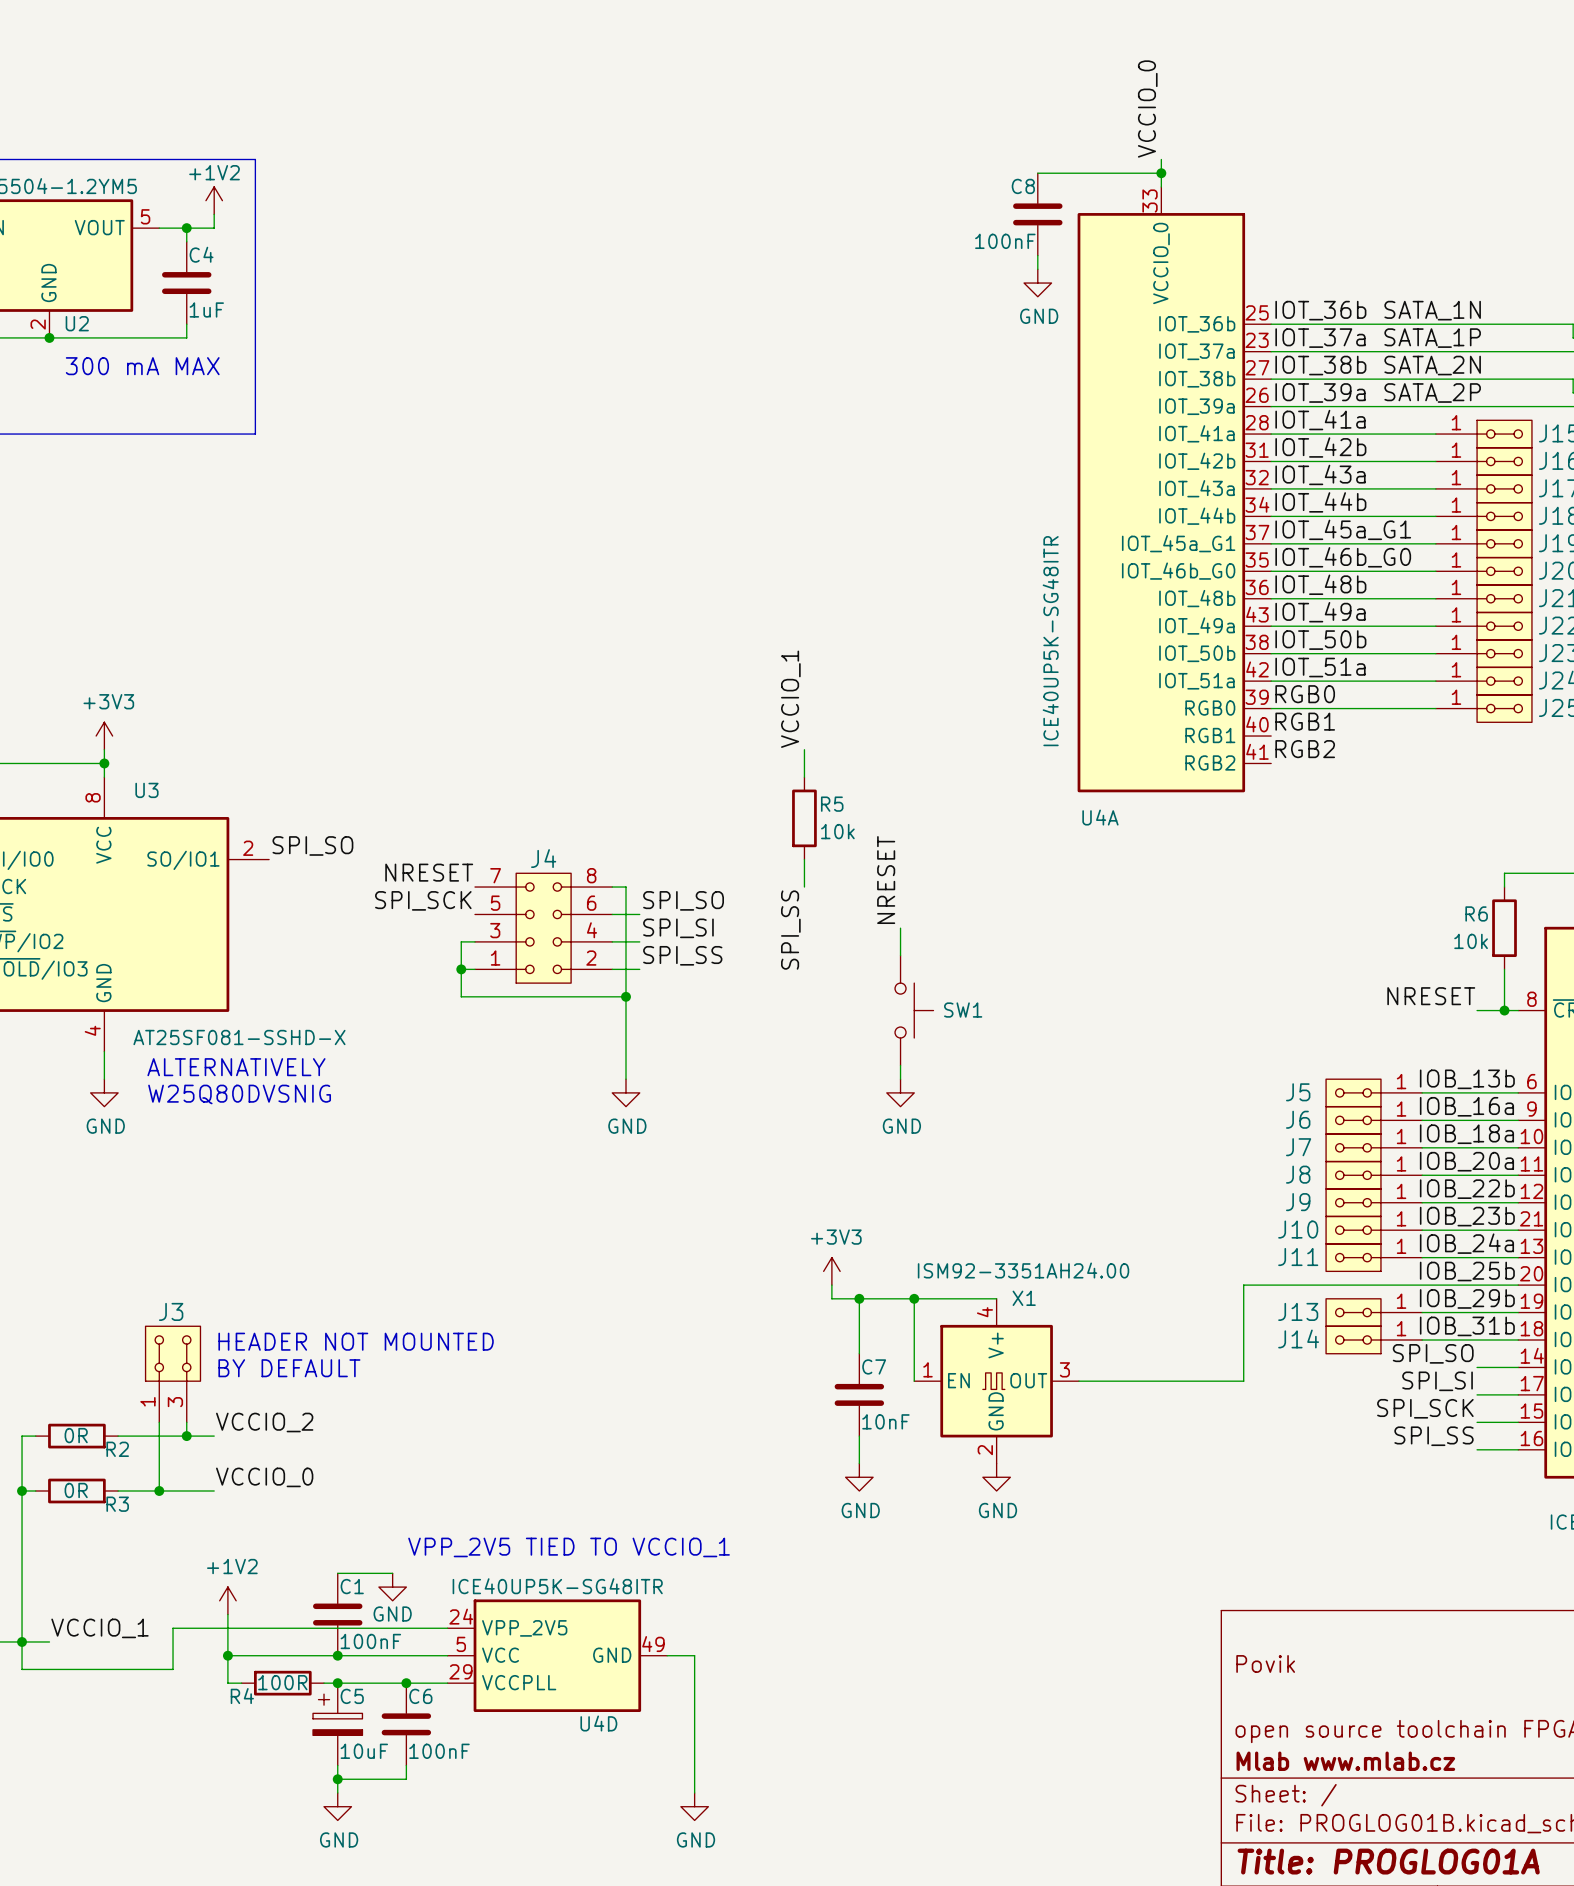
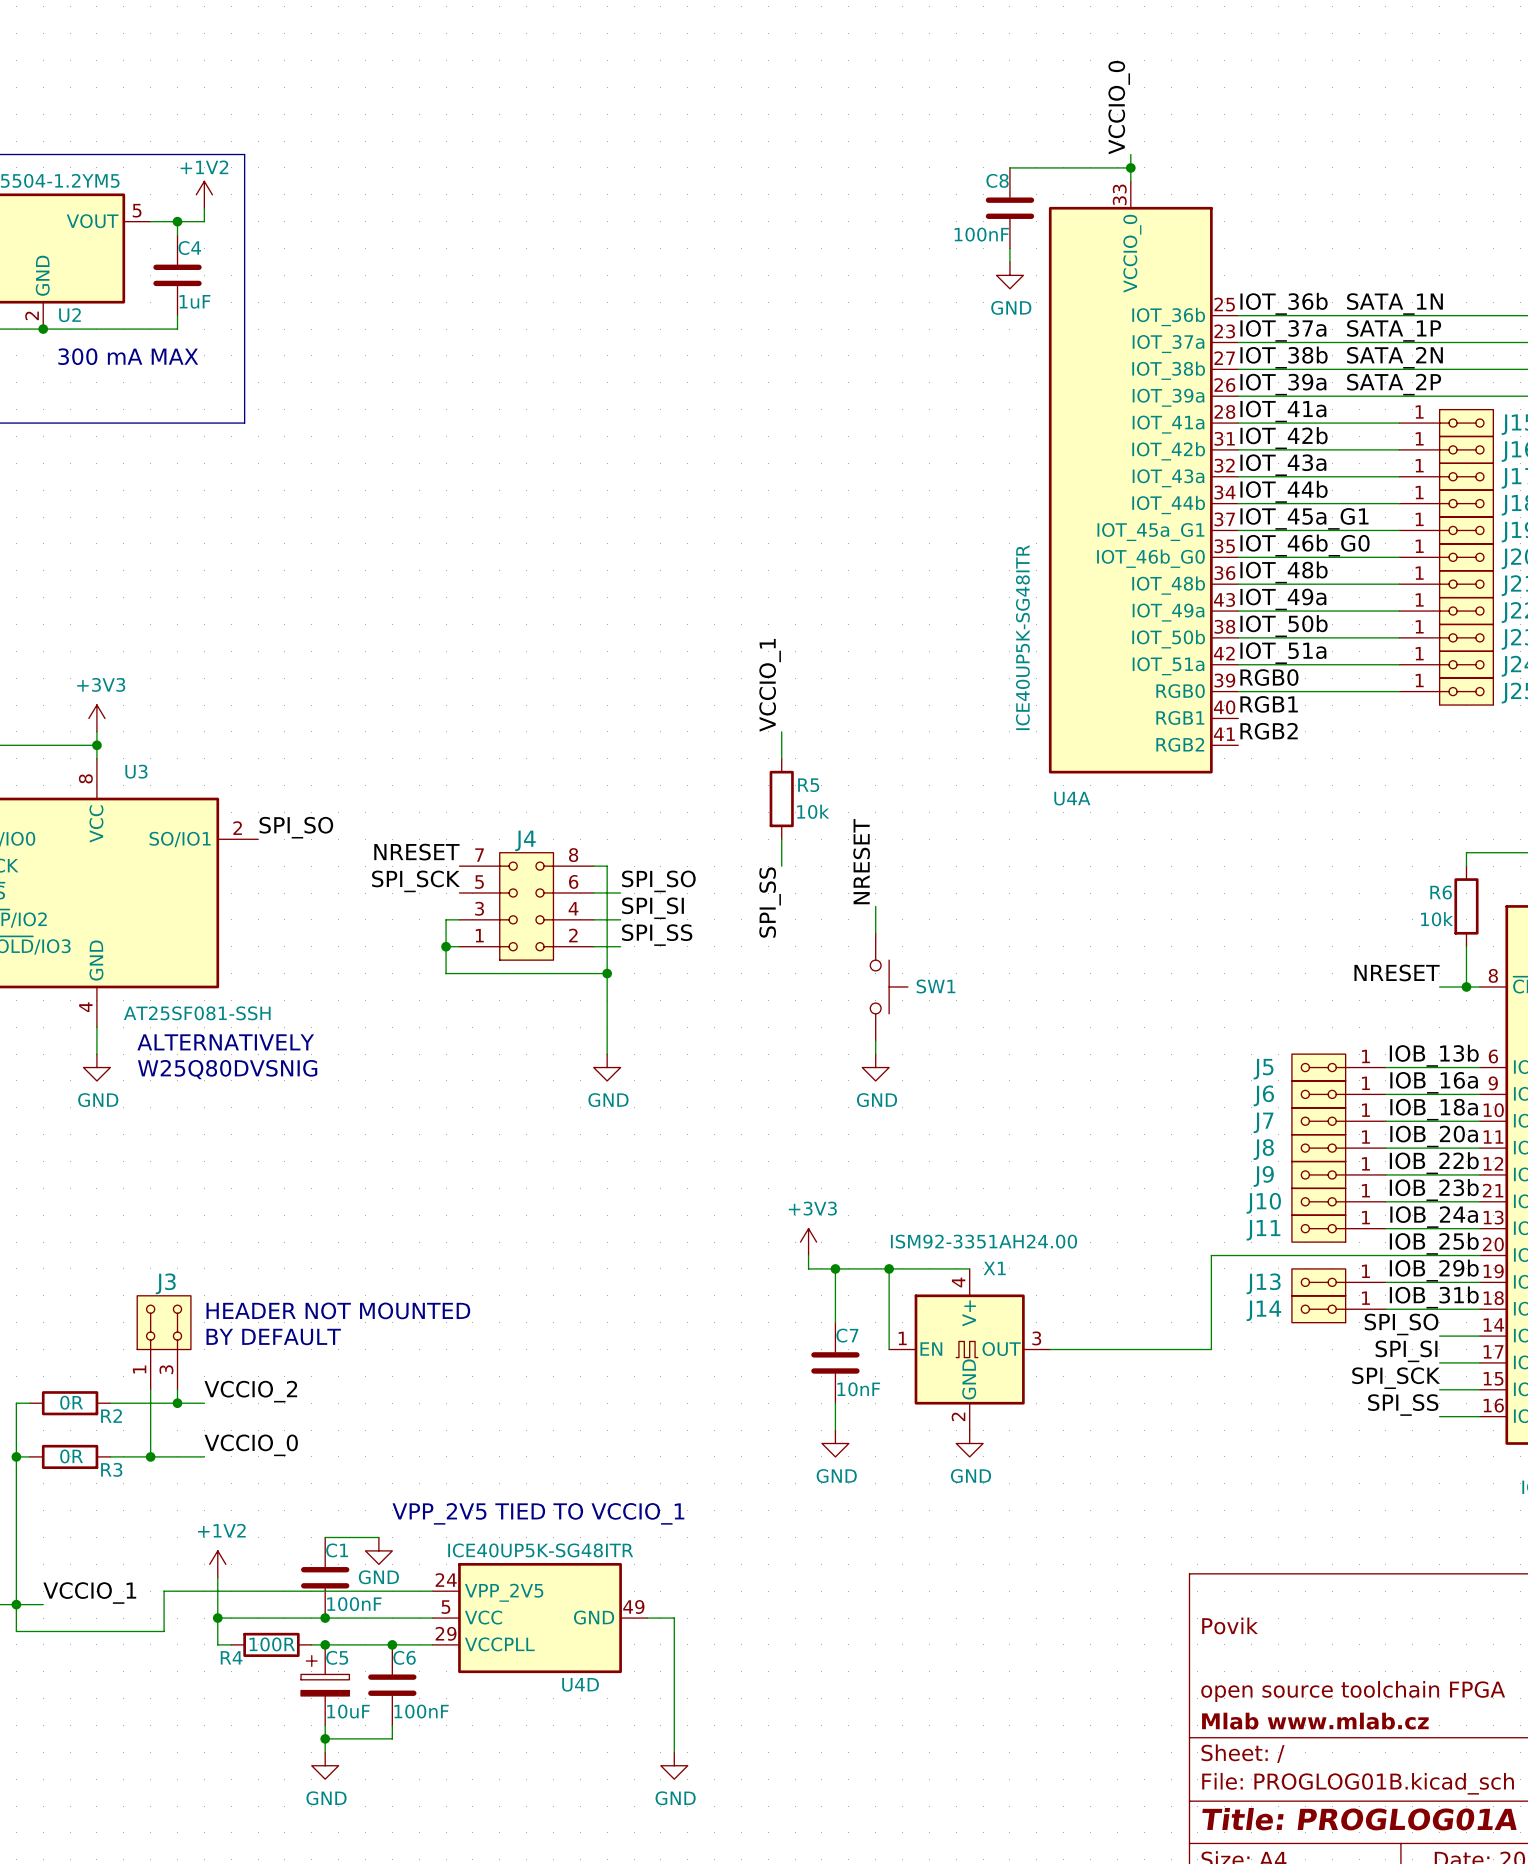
U3 value: AT25SF081-SSHD-X (239, 1037) -> AT25SF081-SSH (197, 1013)

